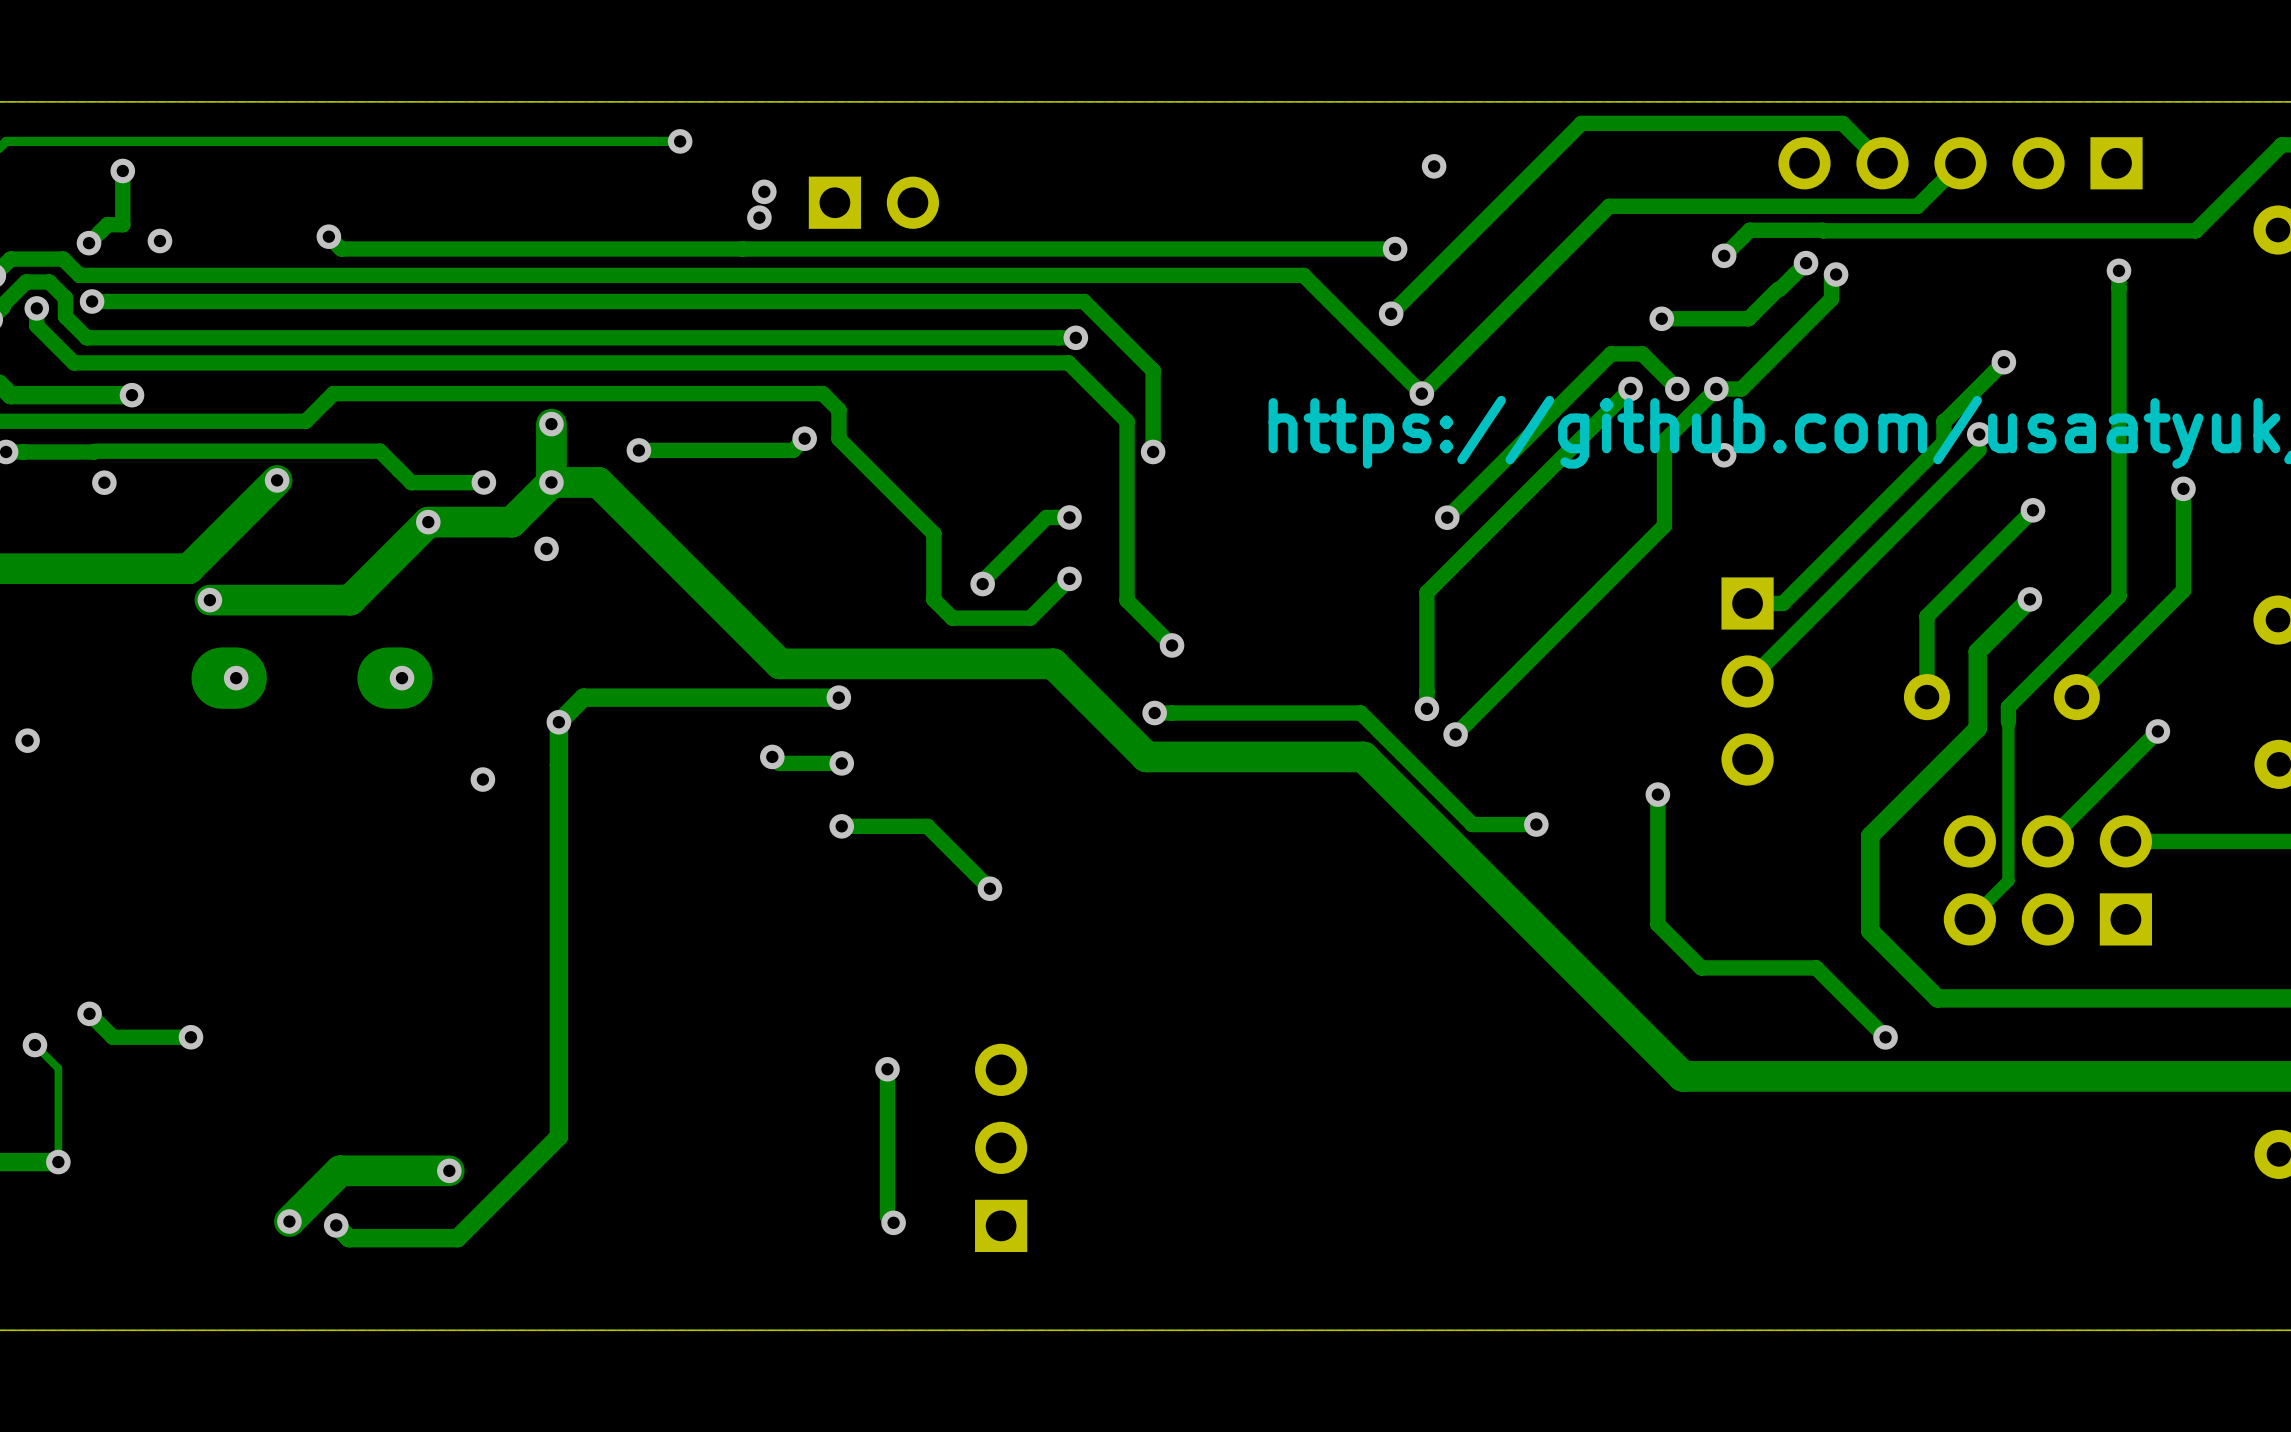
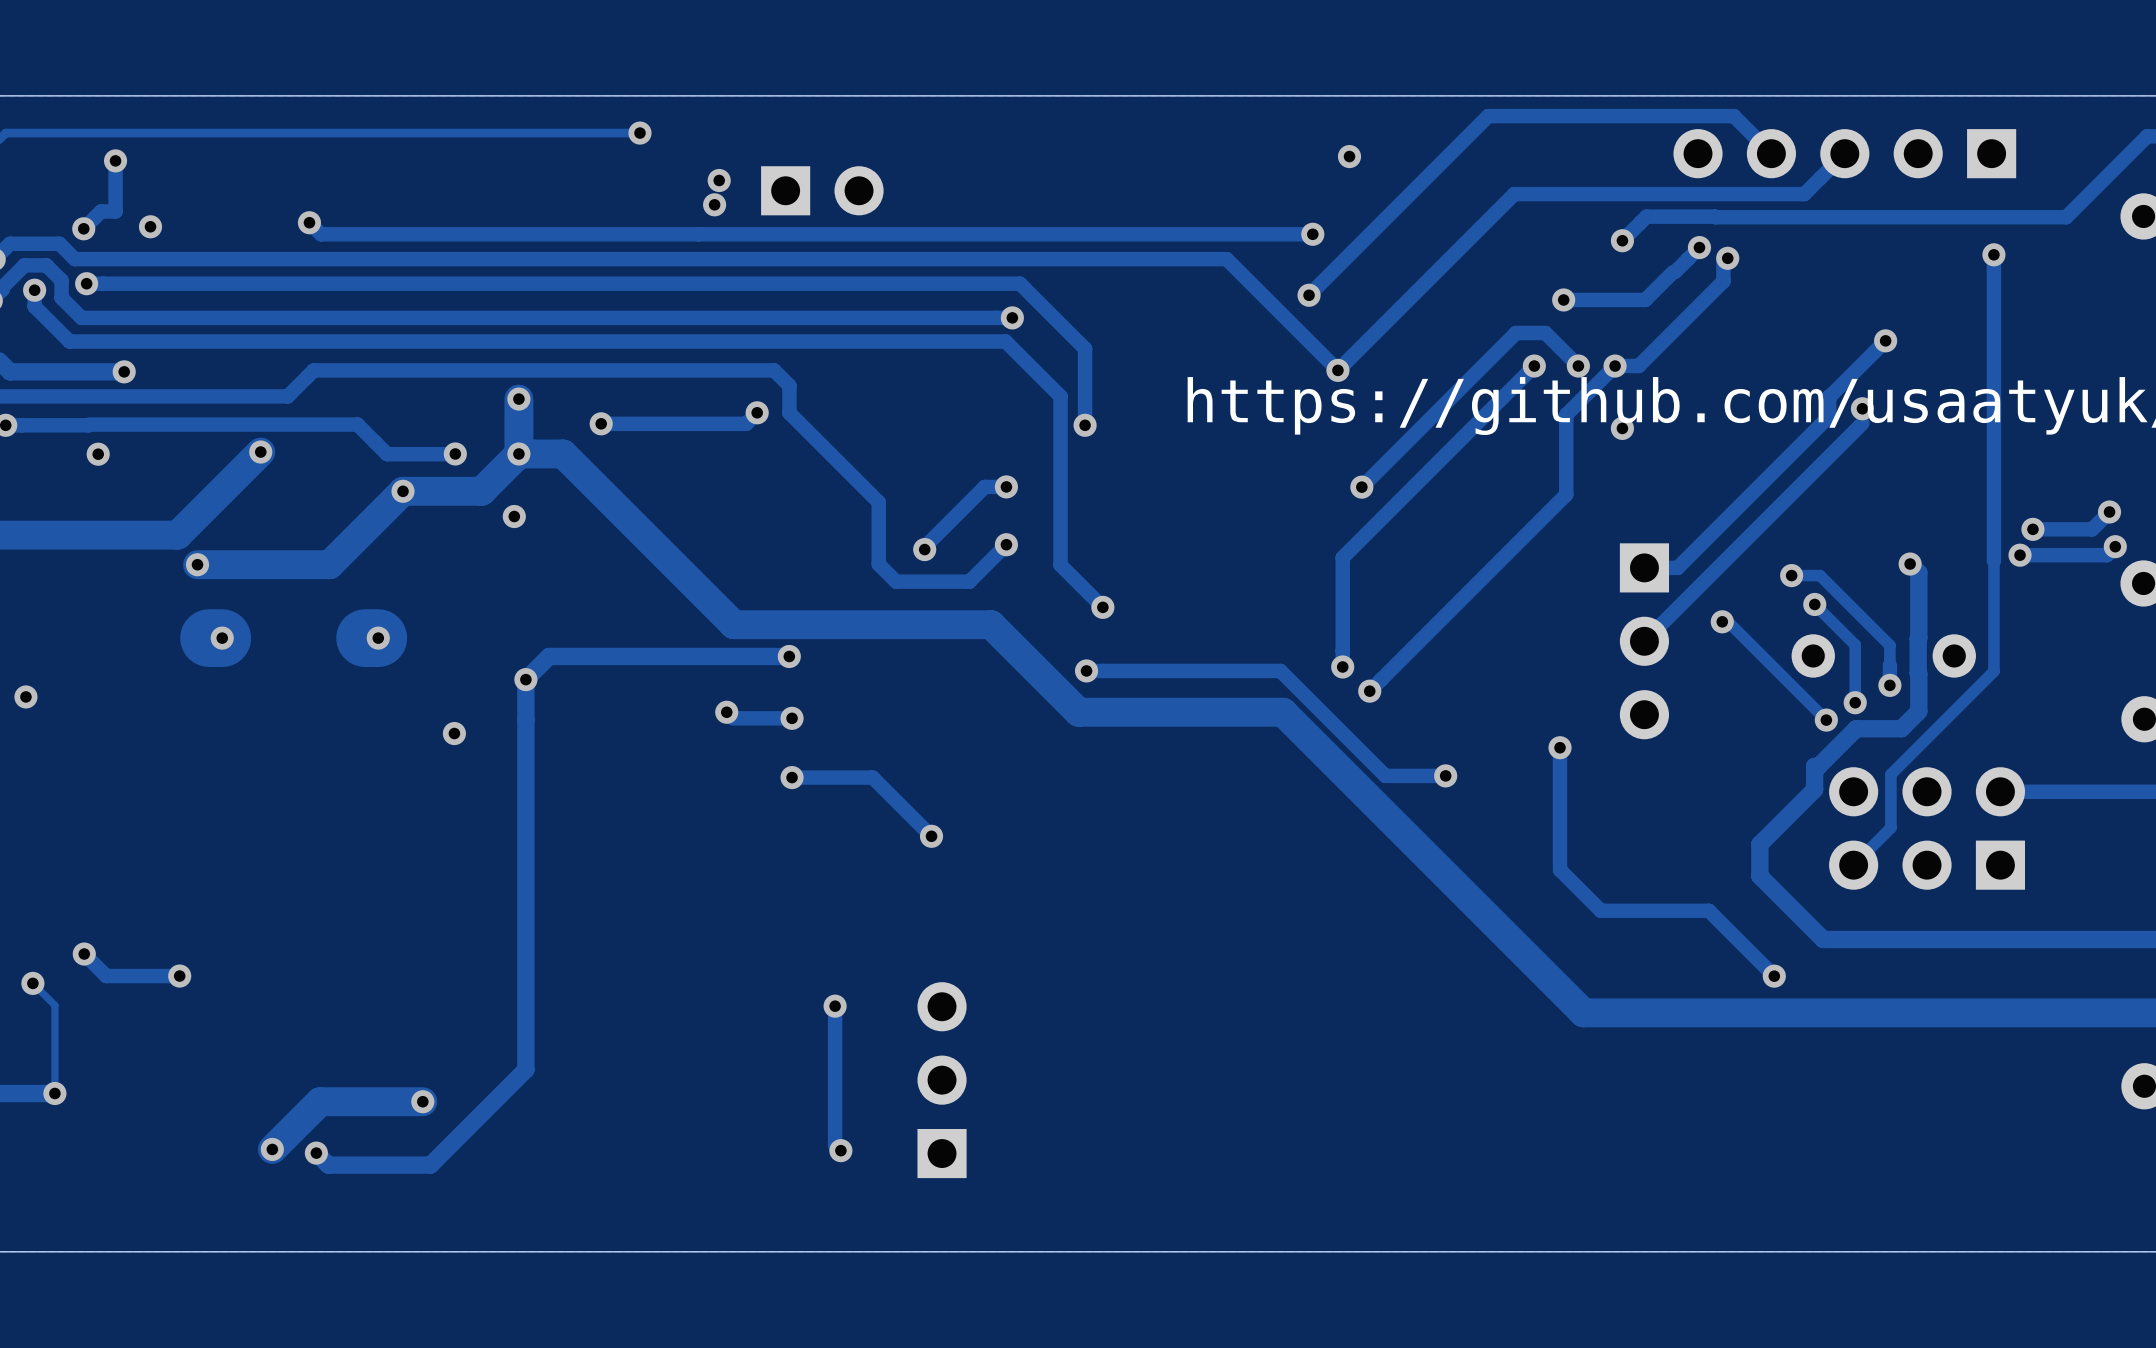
track: (2183, 488) (2183, 590) (2076, 697) -> none
via: (2183, 488) -> none
track: (2032, 510) (1926, 616) (1926, 697) -> none
via: (2032, 510) -> none
track: none -> (2109, 512) (2092, 529) (2032, 529)
via: none -> (2109, 512)
via: none -> (2032, 529)
track: none -> (2115, 546) (2106, 555) (2020, 555)
via: none -> (2115, 546)
via: none -> (2020, 555)
track: (2118, 596) (2008, 706) -> (1791, 575) (1820, 575) (1889, 645) (1889, 665)
track: (2029, 599) (1977, 651) (1977, 728) (1870, 835) (1870, 897) -> (1910, 564) (1918, 572) (1918, 711) (1901, 728) (1856, 728) (1818, 766) (1814, 766) (1814, 789) (1759, 844)
via: none -> (1791, 575)
track: none -> (1814, 604) (1855, 644) (1855, 702)
via: none -> (1814, 604)
track: none -> (1722, 621) (1728, 621) (1826, 720)
via: none -> (1722, 621)
track: (2008, 728) (2008, 880) -> (1993, 561) (1993, 671) (1890, 774) (1889, 828)
via: none -> (1889, 685)
track: (2157, 731) (2047, 841) -> none
via: (2157, 731) -> none
via: none -> (1855, 702)
via: none -> (1826, 720)

